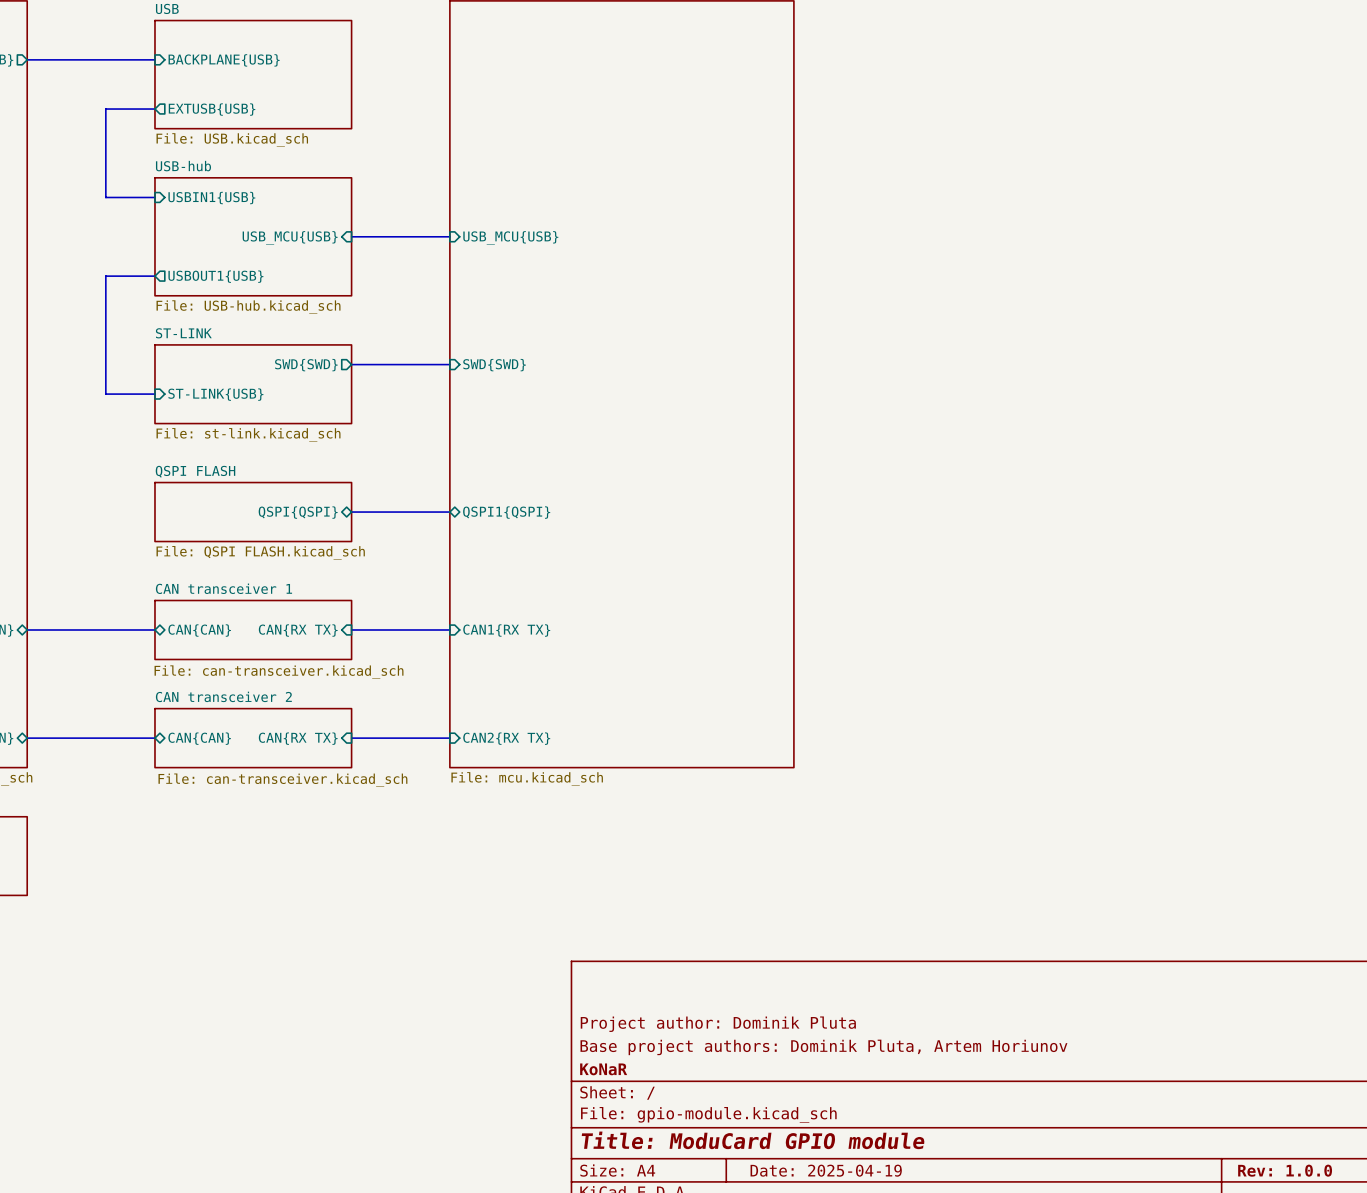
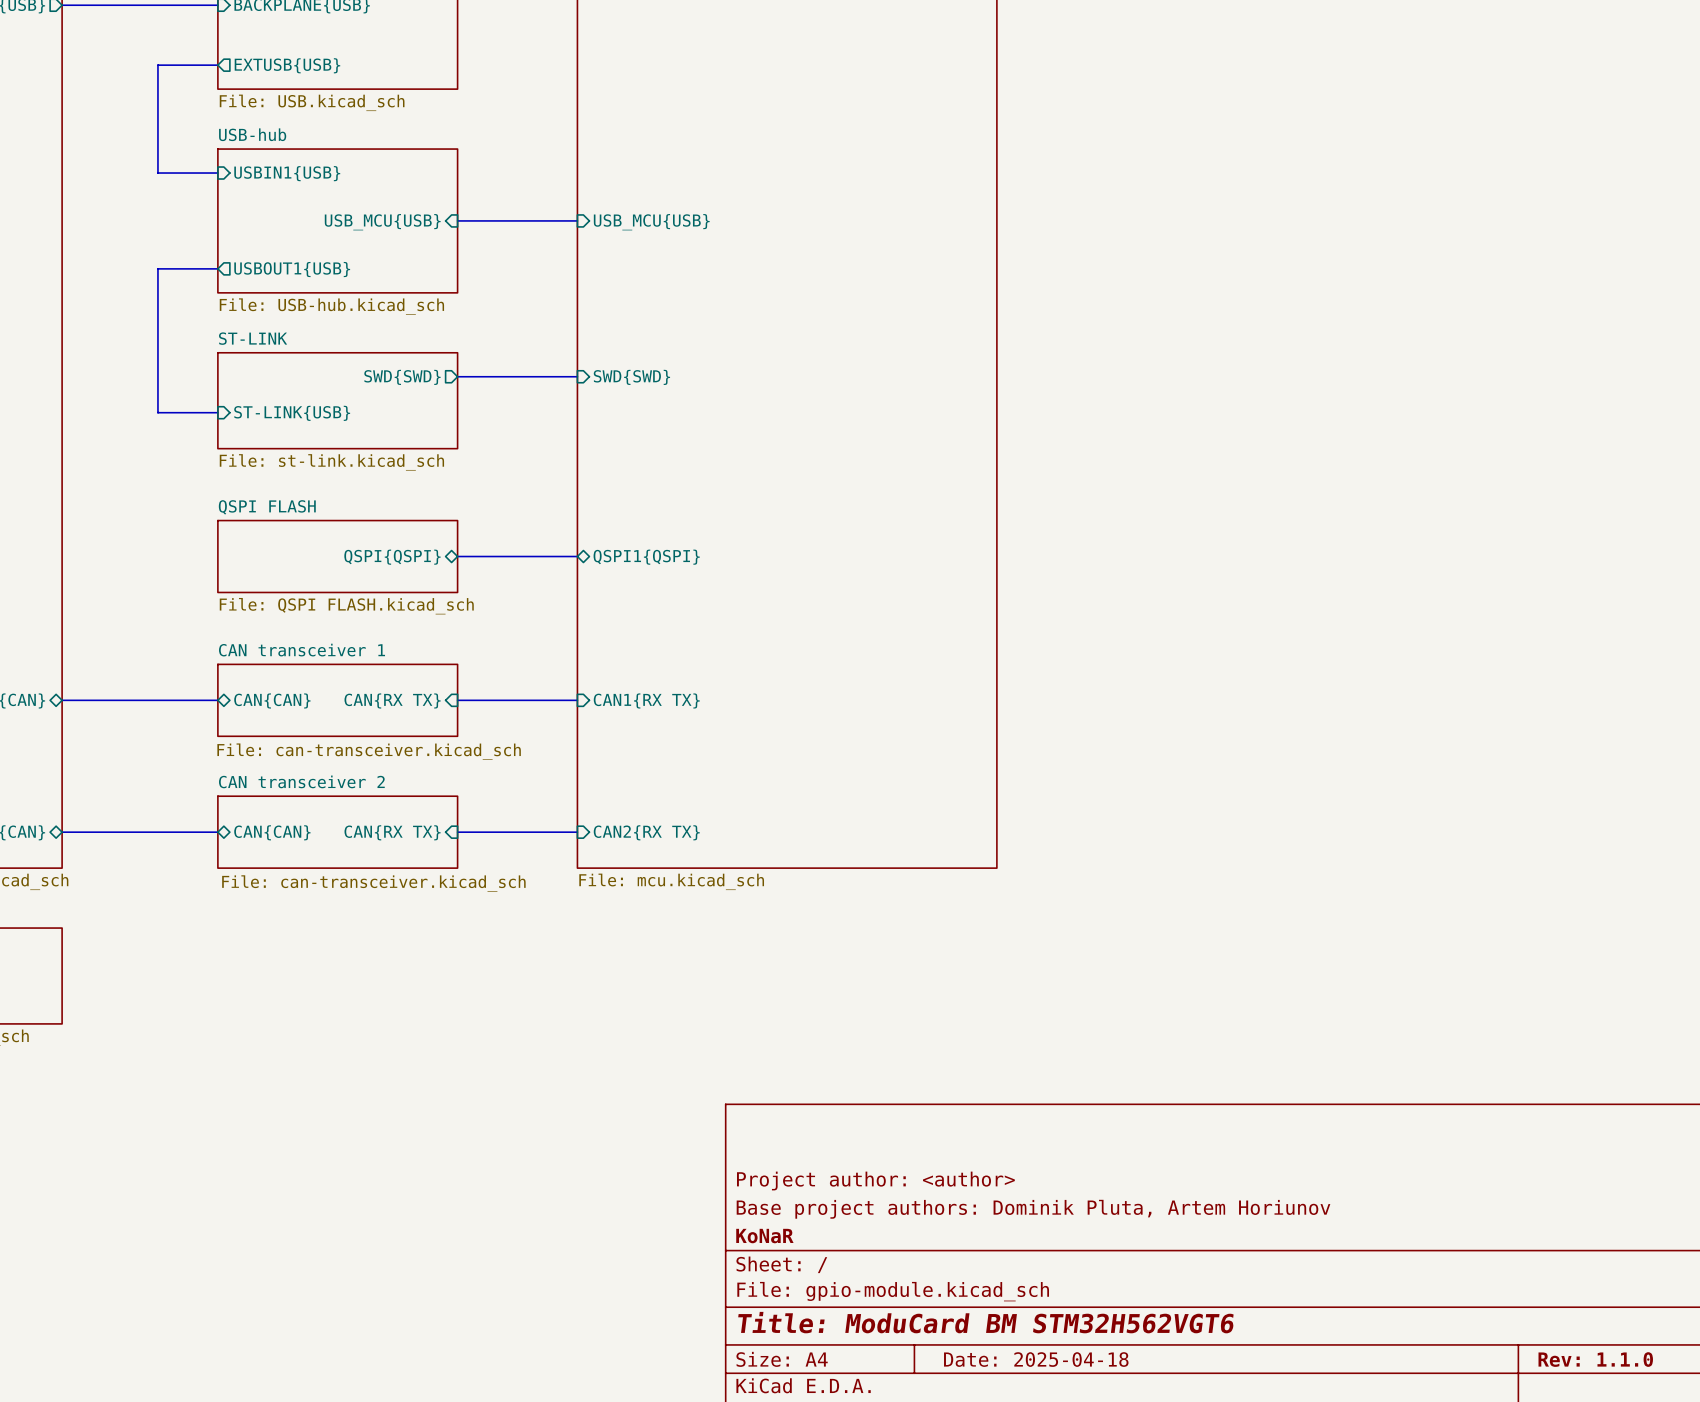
title block: Project author: Dominik Pluta (718, 1024) -> Project author: <author> (875, 1181)
title block: Title: ModuCard GPIO module (753, 1140) -> Title: ModuCard BM STM32H562VGT6 (985, 1322)
title block: Date: 2025-04-19 (826, 1170) -> Date: 2025-04-18 (1036, 1359)
title block: Rev: 1.0.0 (1285, 1170) -> Rev: 1.1.0 (1595, 1359)

